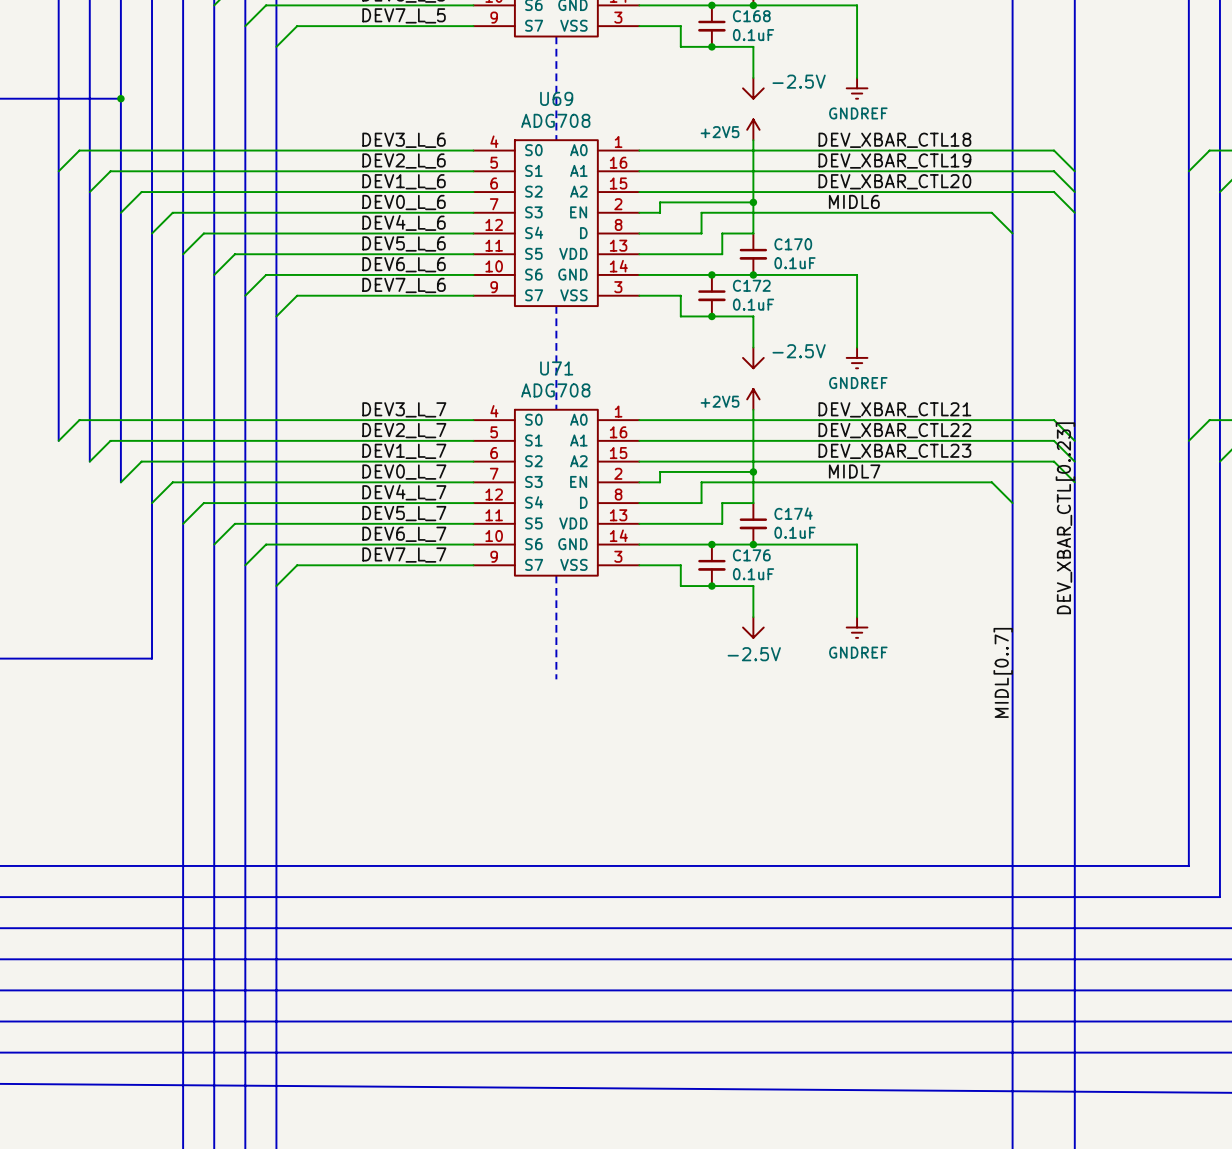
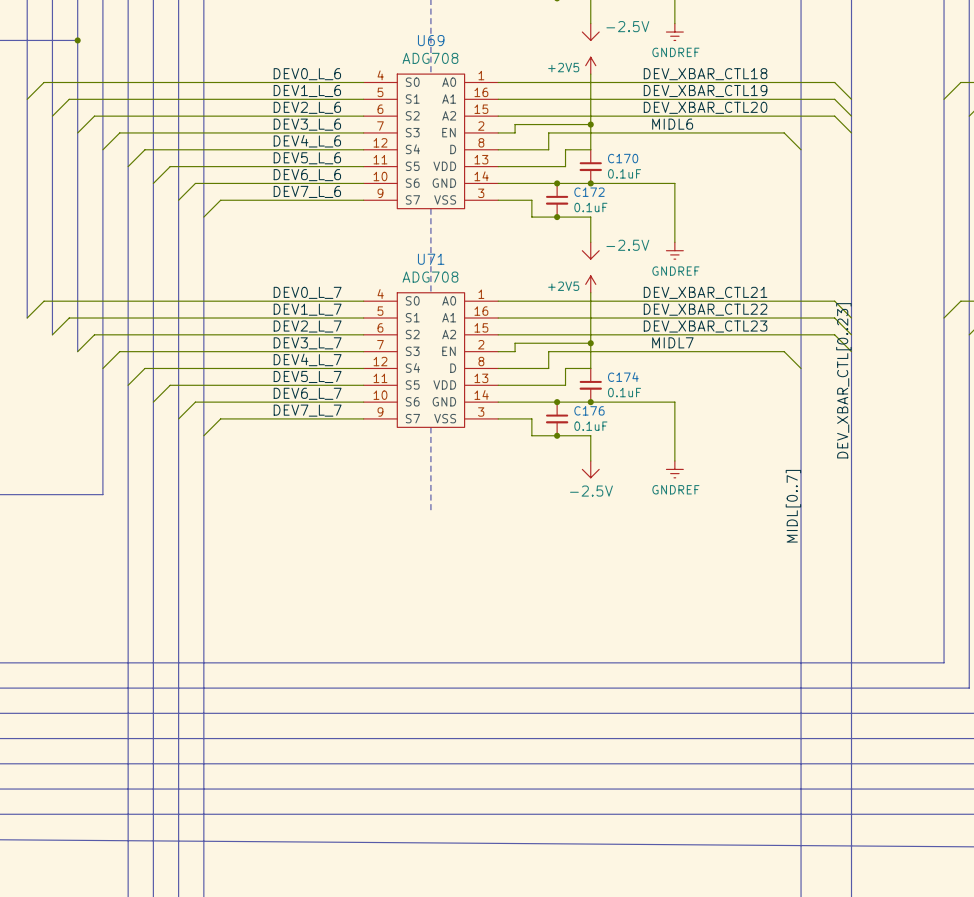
label: DEV3_L_6 (404, 140) -> DEV0_L_6 (307, 74)
label: DEV2_L_6 (404, 161) -> DEV1_L_6 (307, 90)
label: DEV1_L_6 (404, 181) -> DEV2_L_6 (307, 107)
label: DEV0_L_6 (404, 202) -> DEV3_L_6 (307, 124)
label: DEV3_L_7 (404, 409) -> DEV0_L_7 (307, 292)
label: DEV2_L_7 (404, 430) -> DEV1_L_7 (307, 309)
label: DEV1_L_7 (404, 451) -> DEV2_L_7 (307, 326)
label: DEV0_L_7 (404, 472) -> DEV3_L_7 (307, 343)

